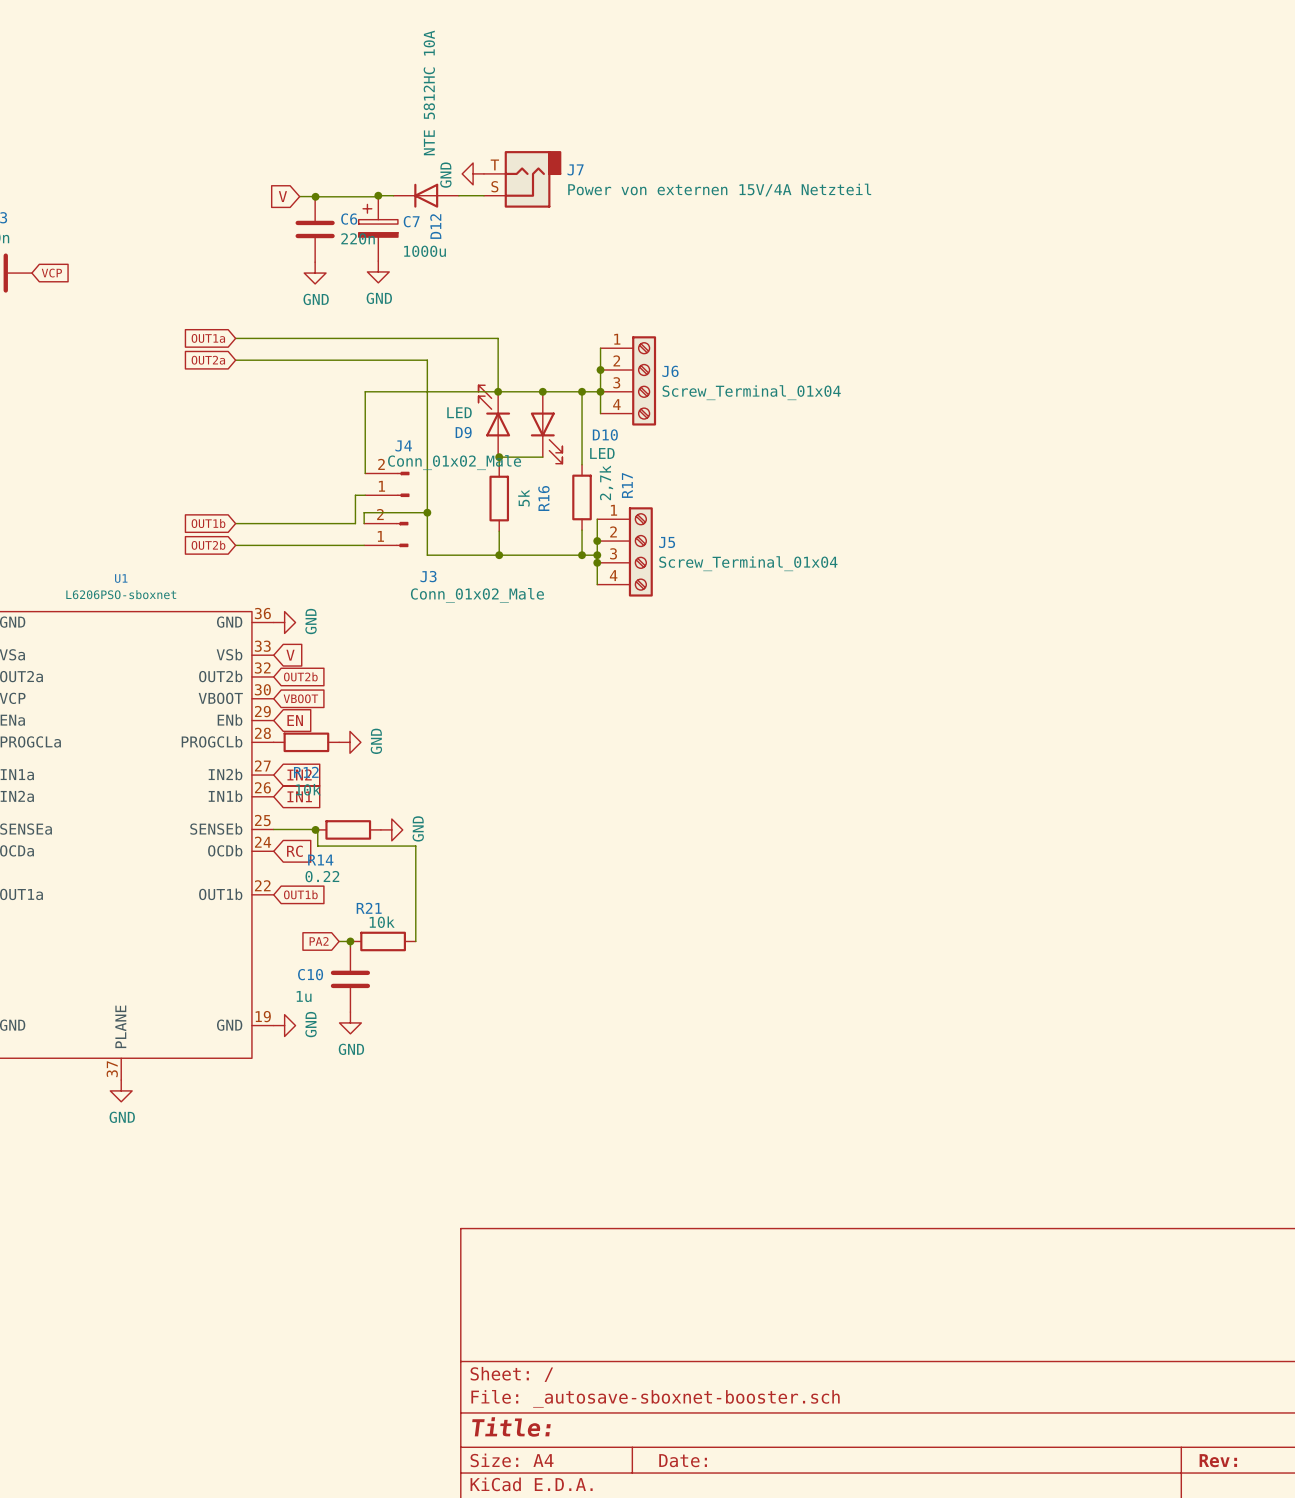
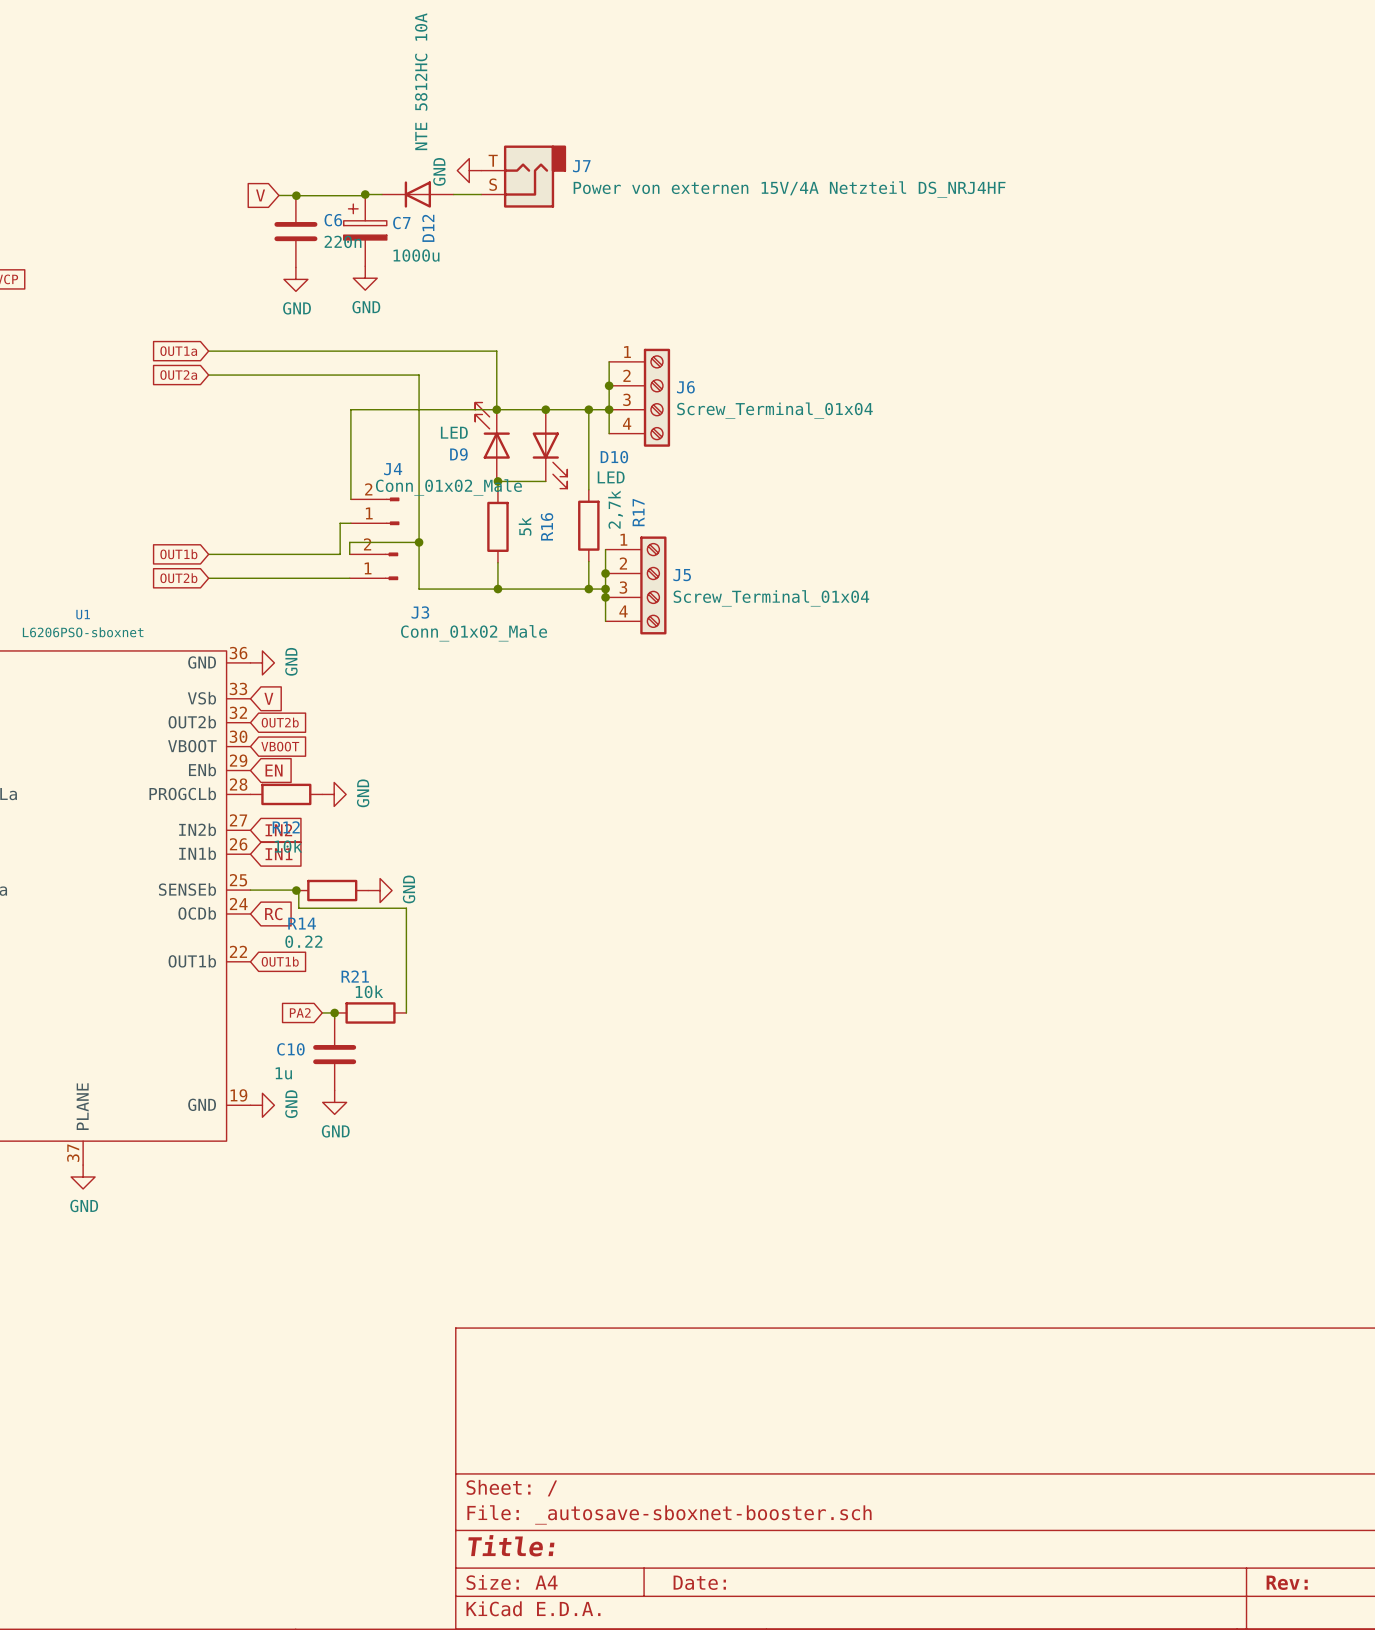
J7 value: Power von externen 15V/4A Netzteil (719, 190) -> Power von externen 15V/4A Netzteil DS_NRJ4HF (789, 189)

